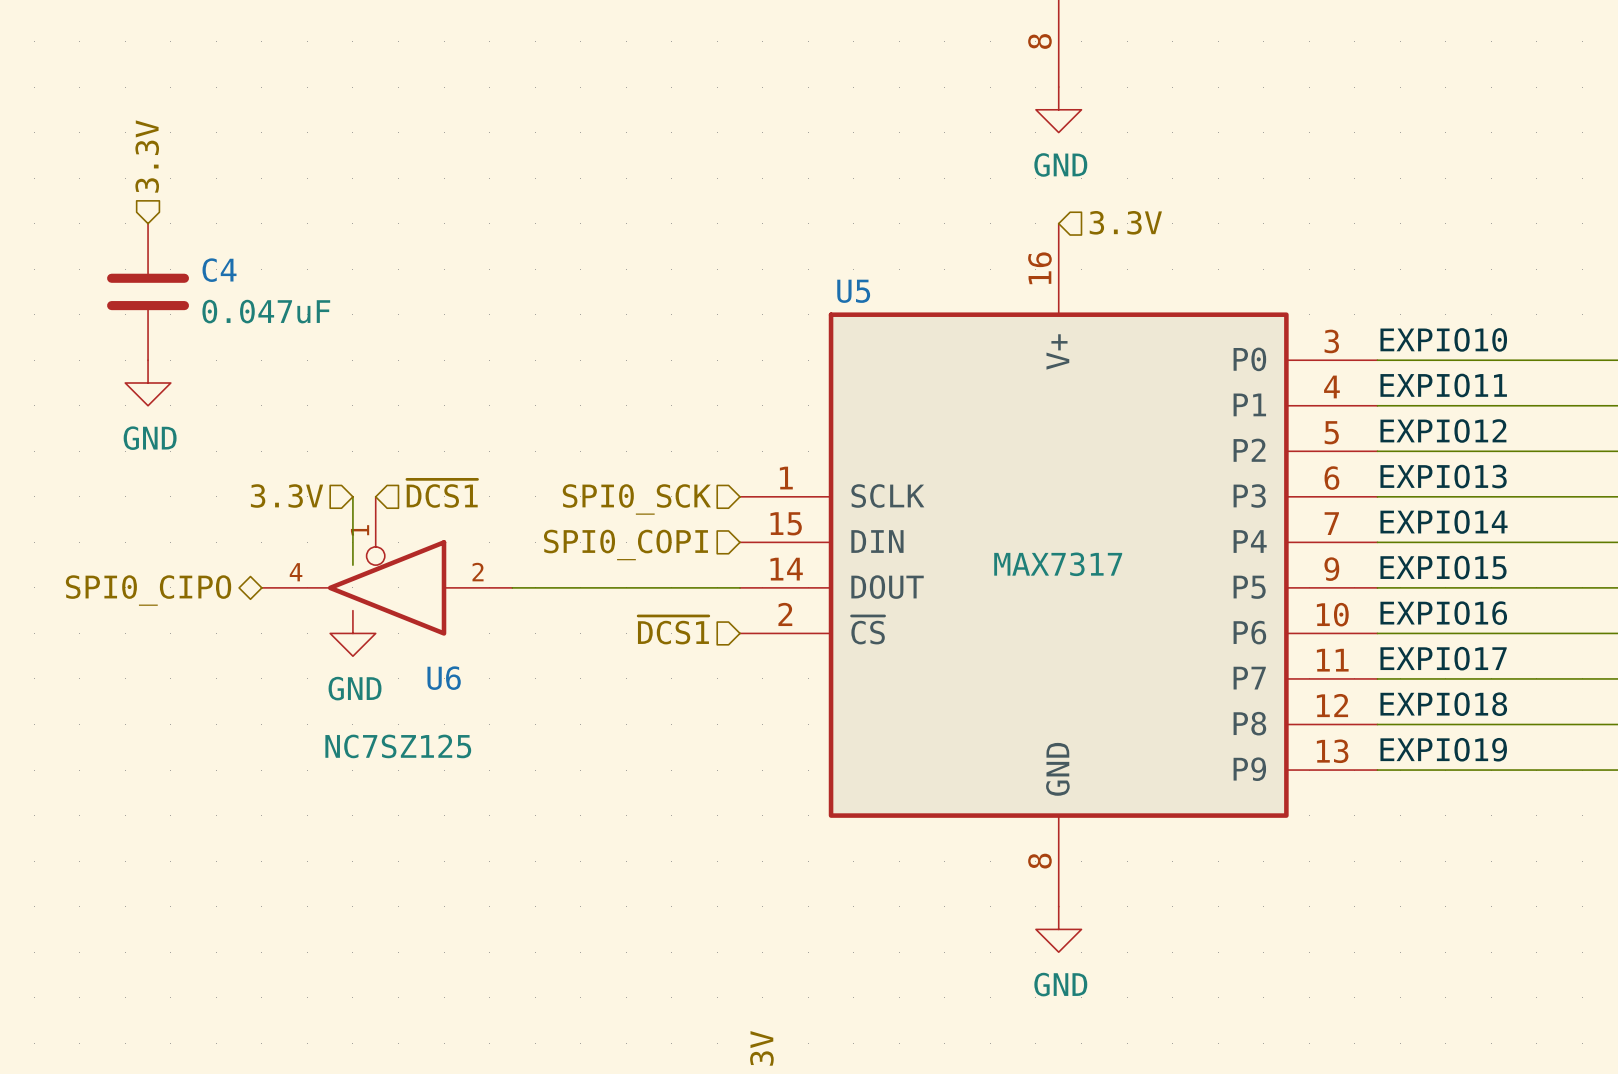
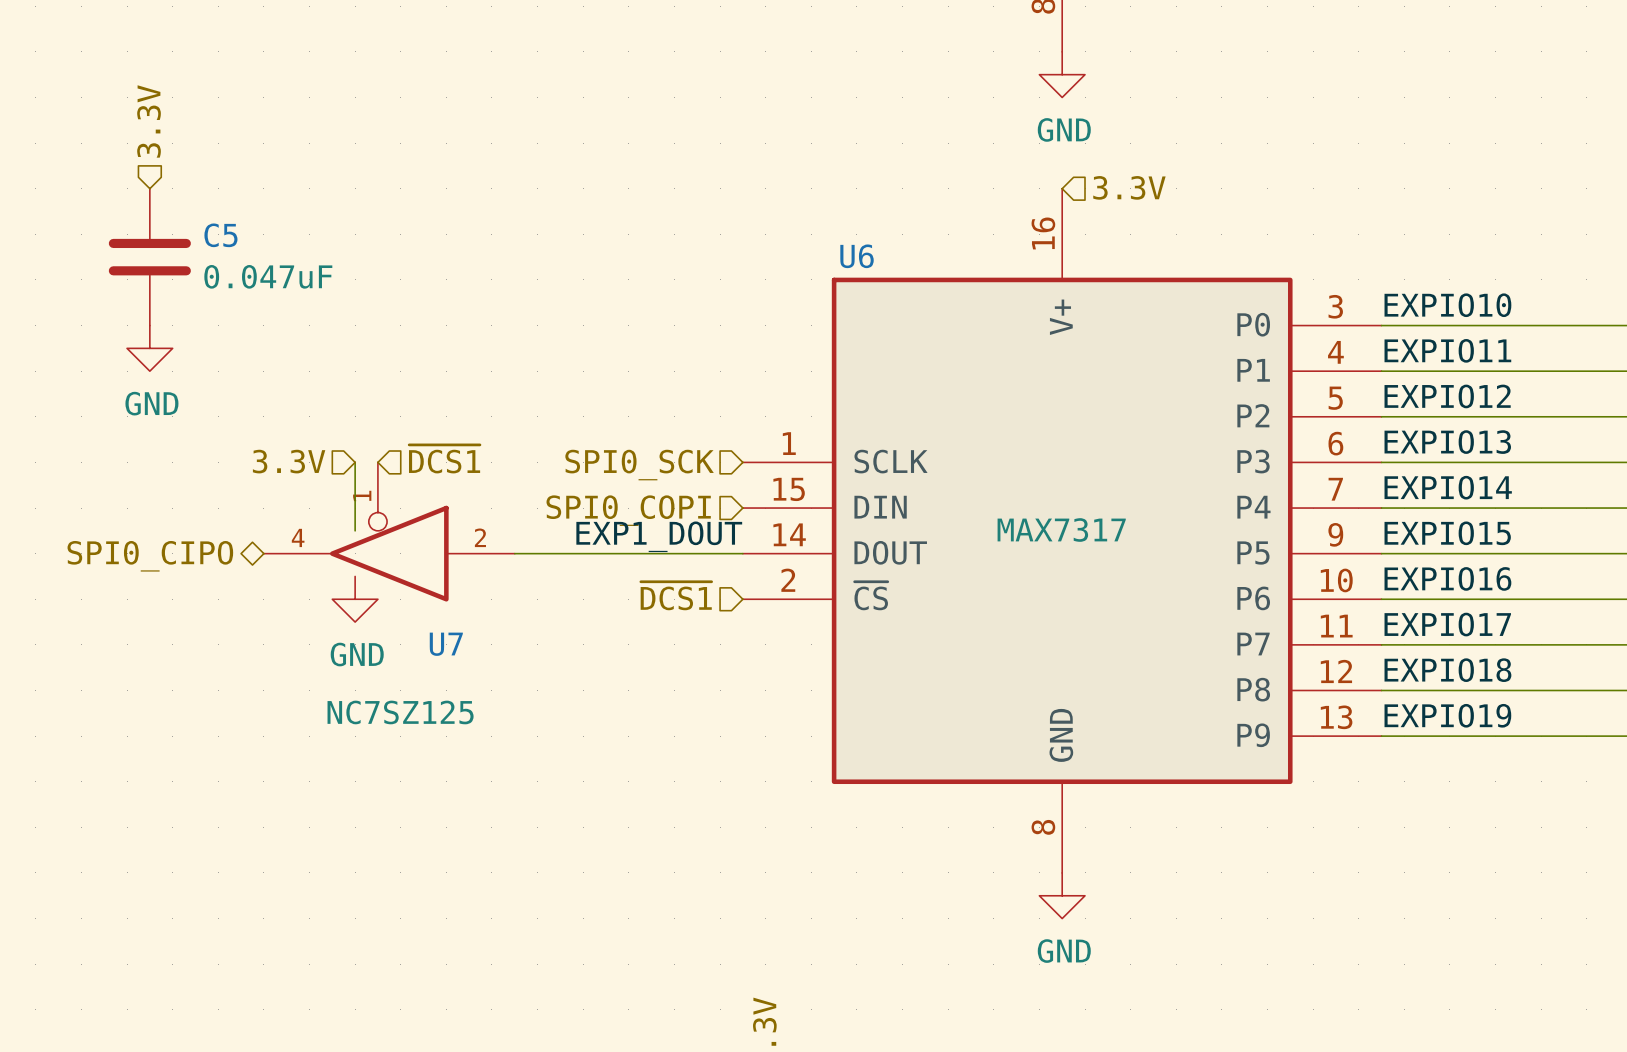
C4 name: C4 (219, 270) -> C5 (220, 235)
U5 name: U5 (853, 291) -> U6 (857, 256)
label: none -> EXP1_DOUT (659, 536)
U6 name: U6 (444, 678) -> U7 (446, 644)

